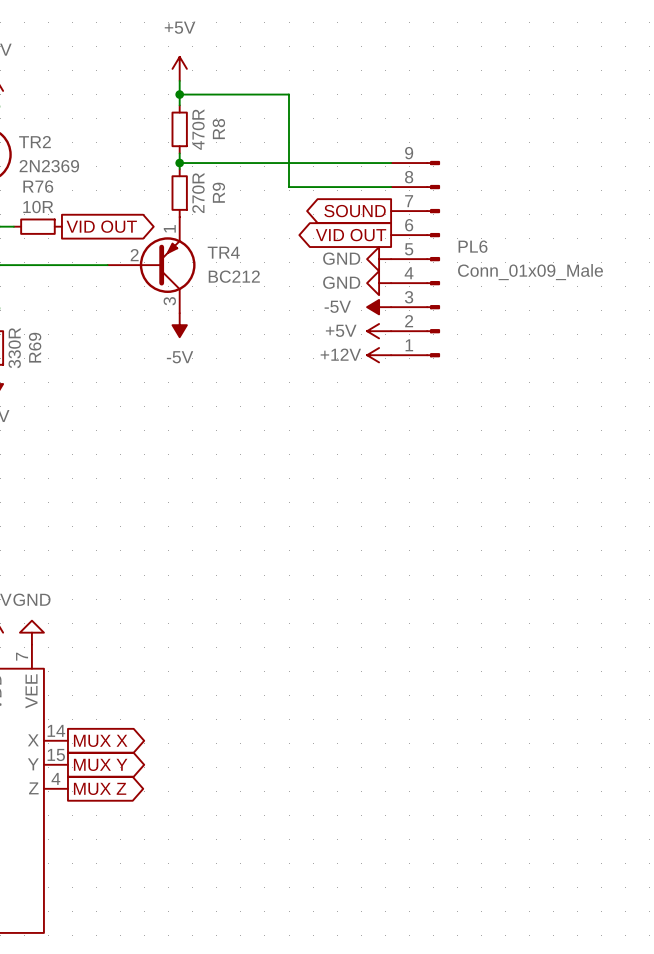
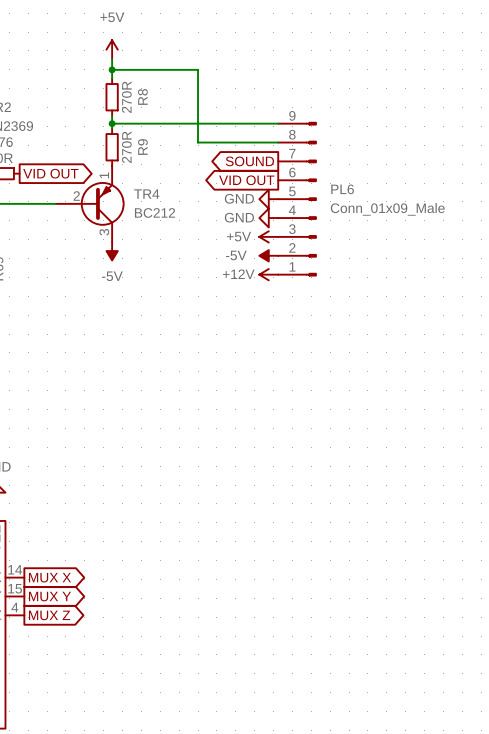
R8 value: 470R (198, 129) -> 270R (126, 97)
power symbol: -5V (379, 307) -> +5V (268, 236)
power symbol: +5V (379, 331) -> -5V (268, 255)

